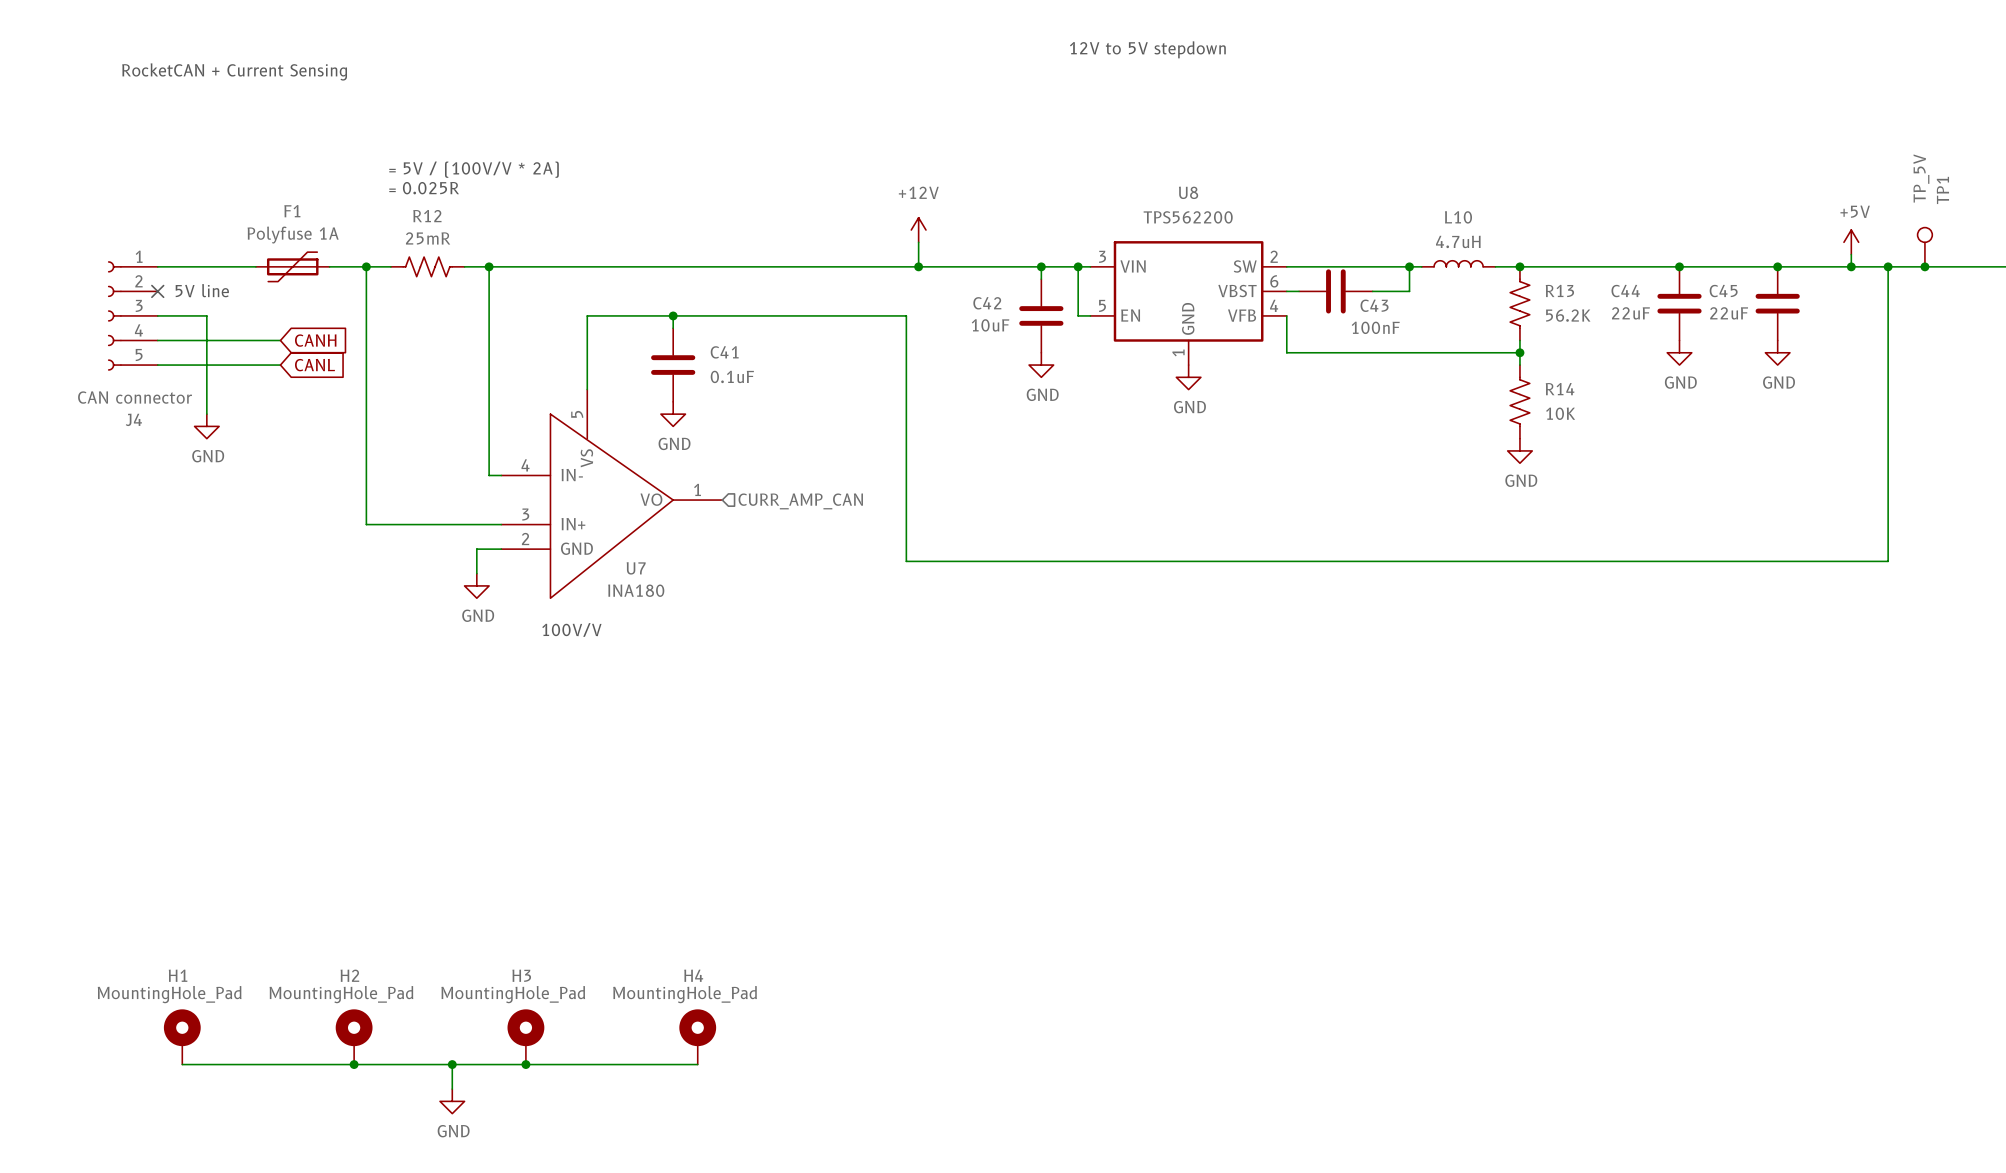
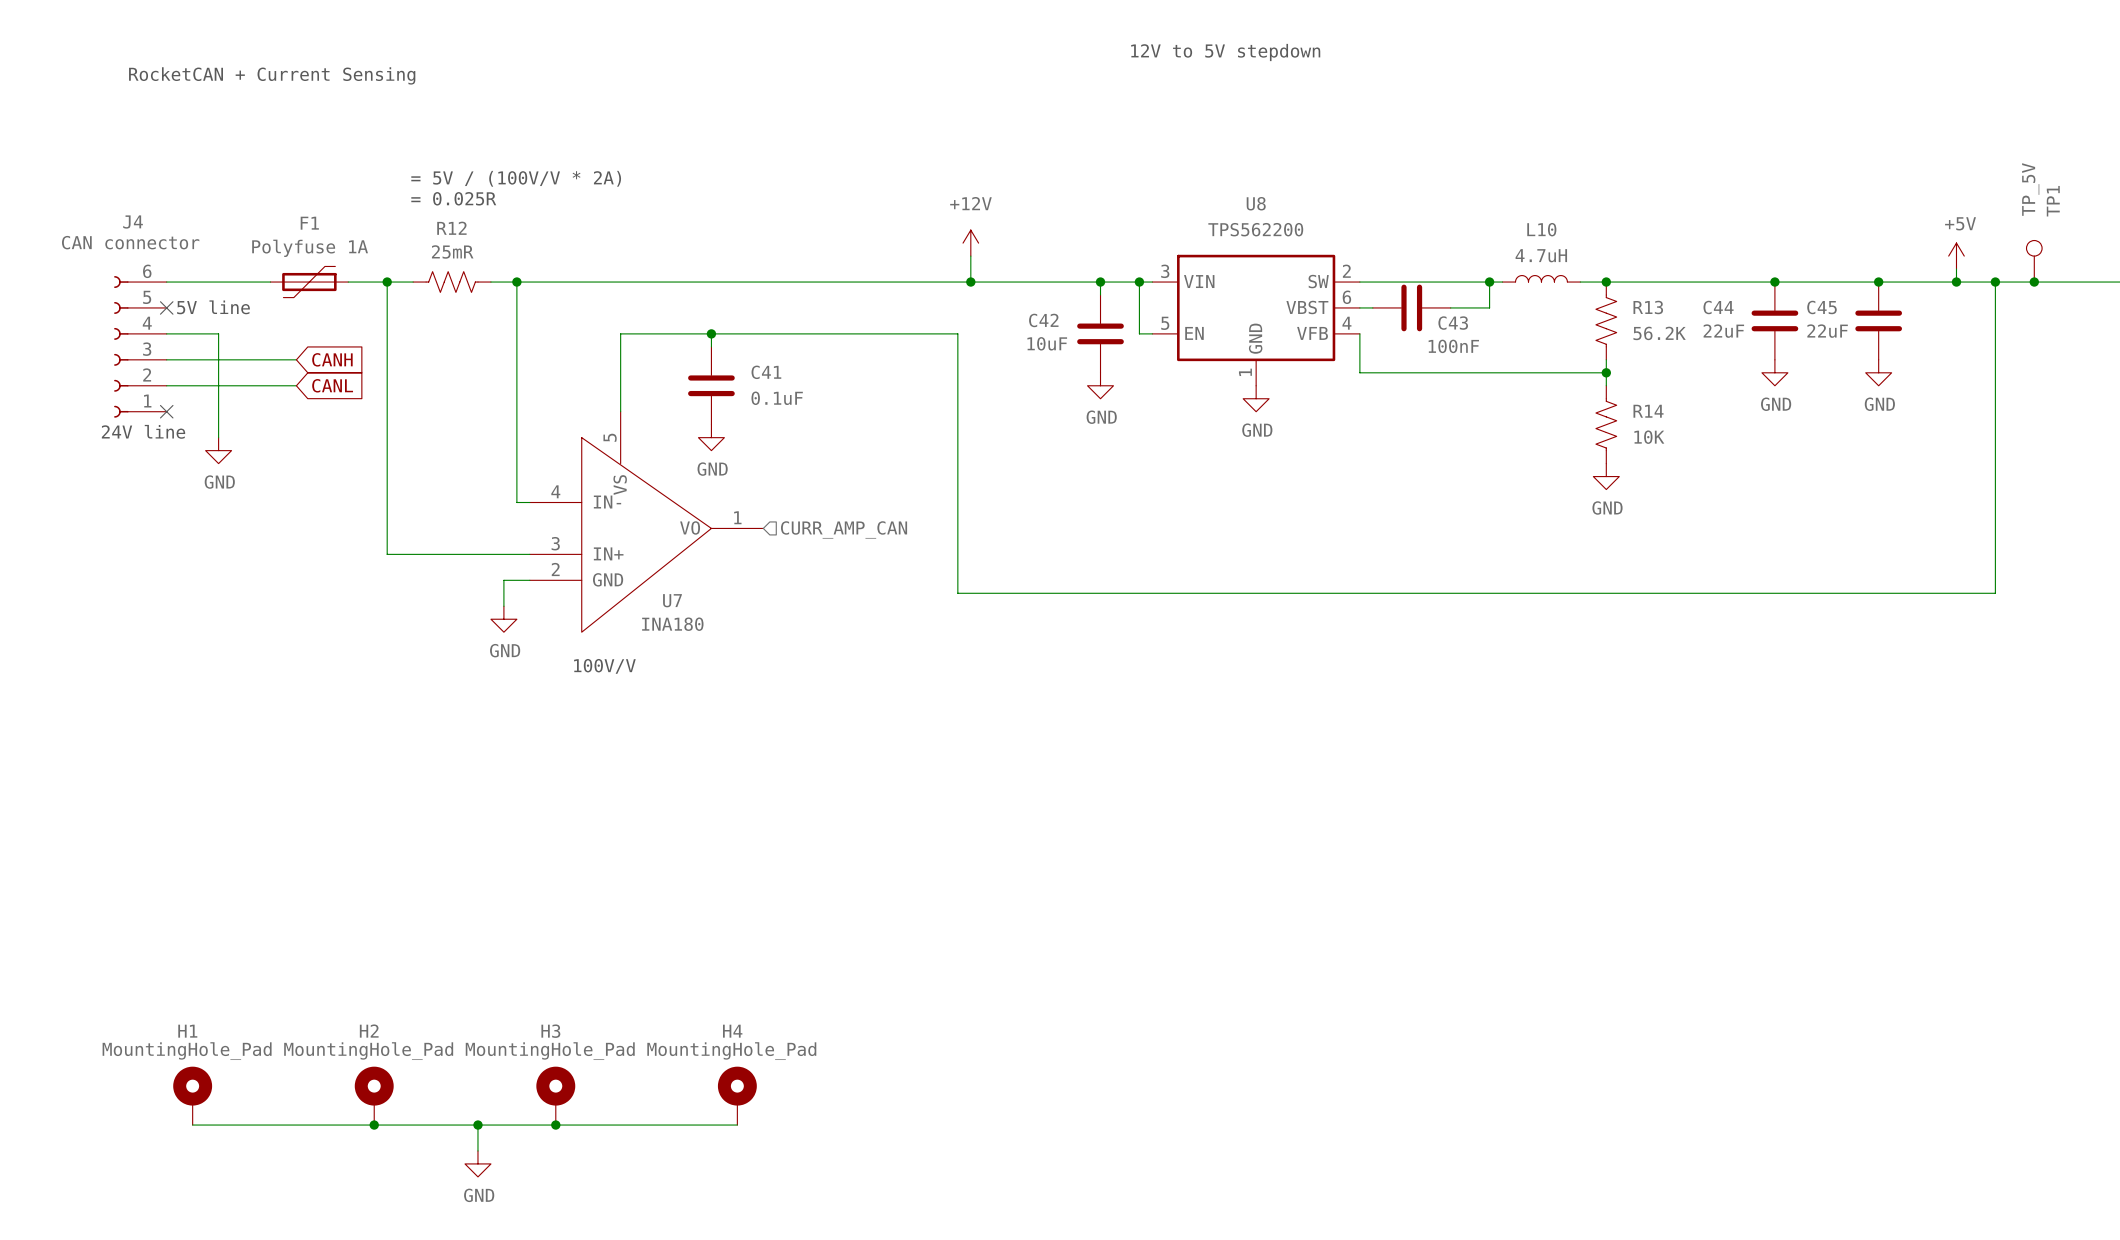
J4 symbol: [107, 261, 158, 371] -> [114, 276, 167, 418]
no-connect mark: none -> (166, 411)
J4 value position: CAN connector (135, 397) -> CAN connector (130, 242)
text: none -> 24V line (143, 431)
J4 name position: J4 (133, 419) -> J4 (133, 222)

